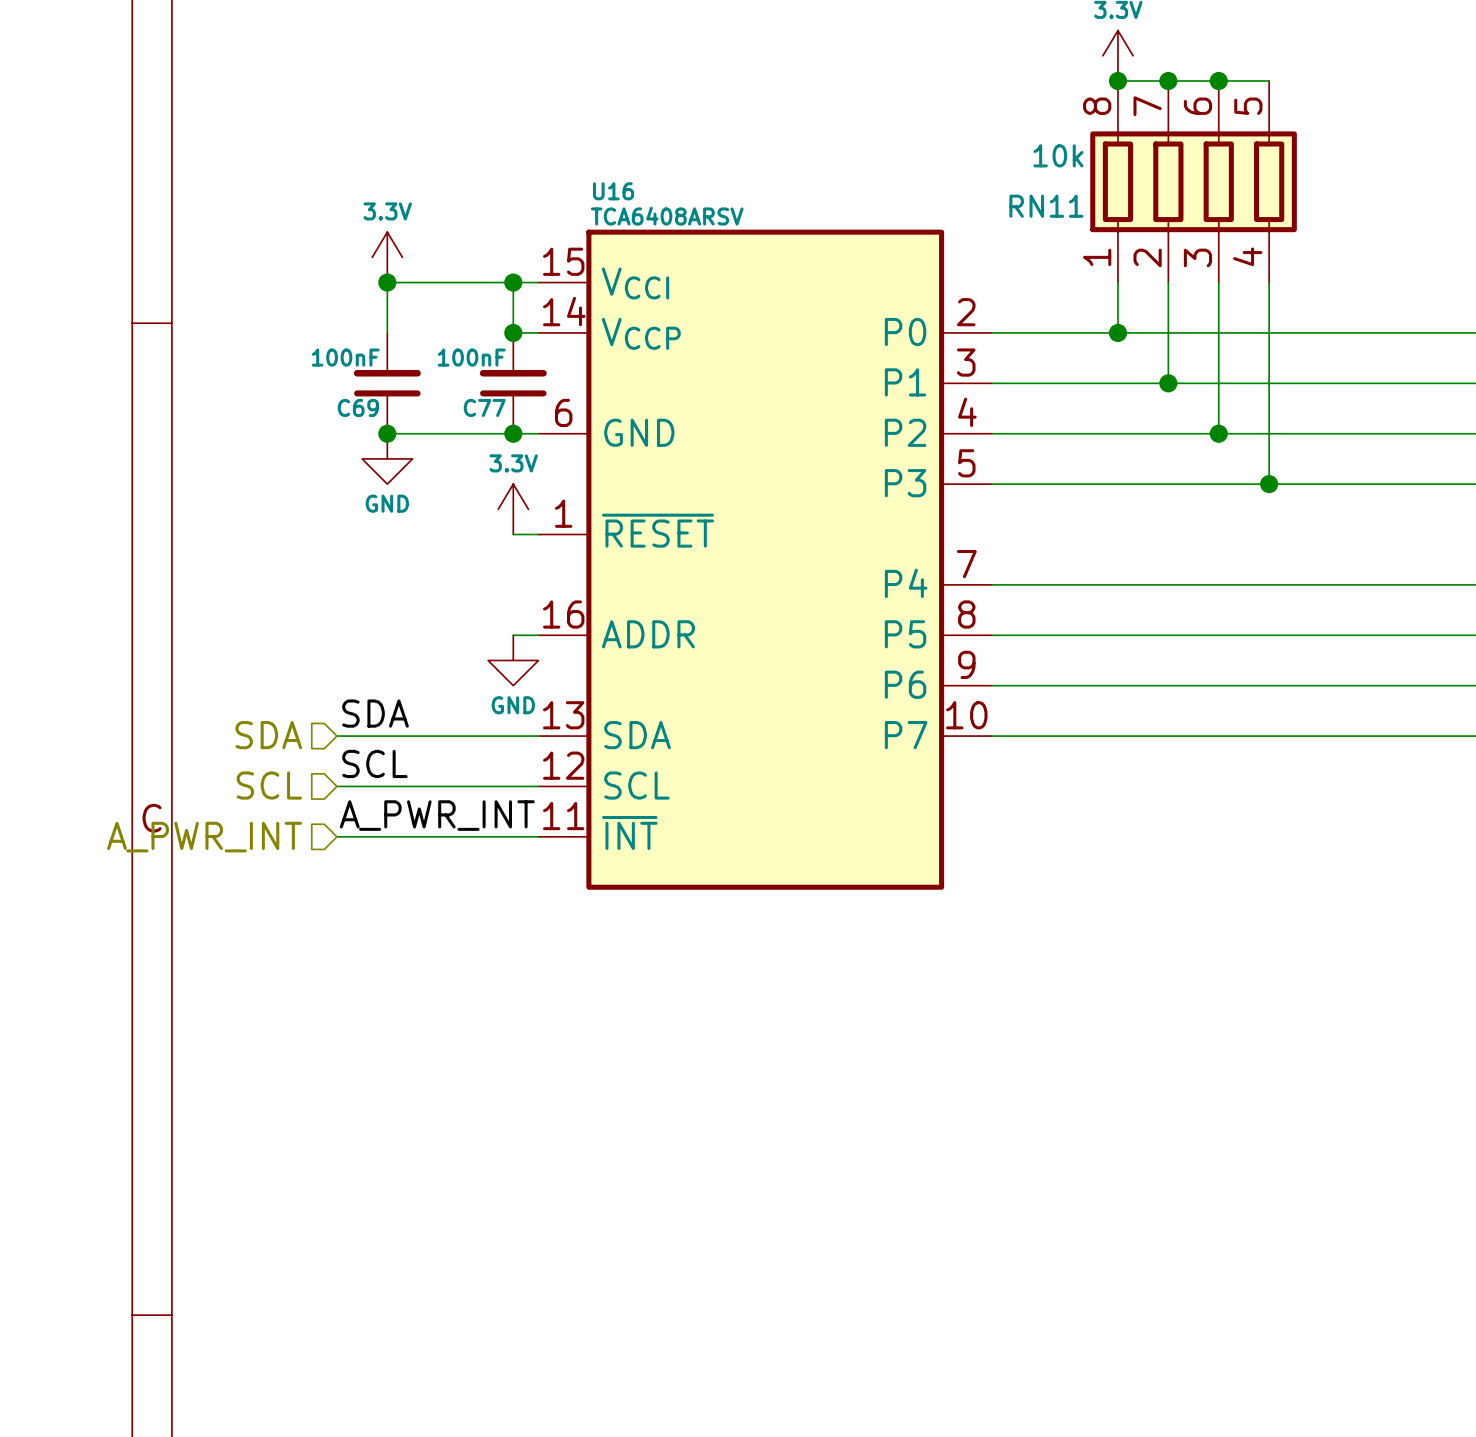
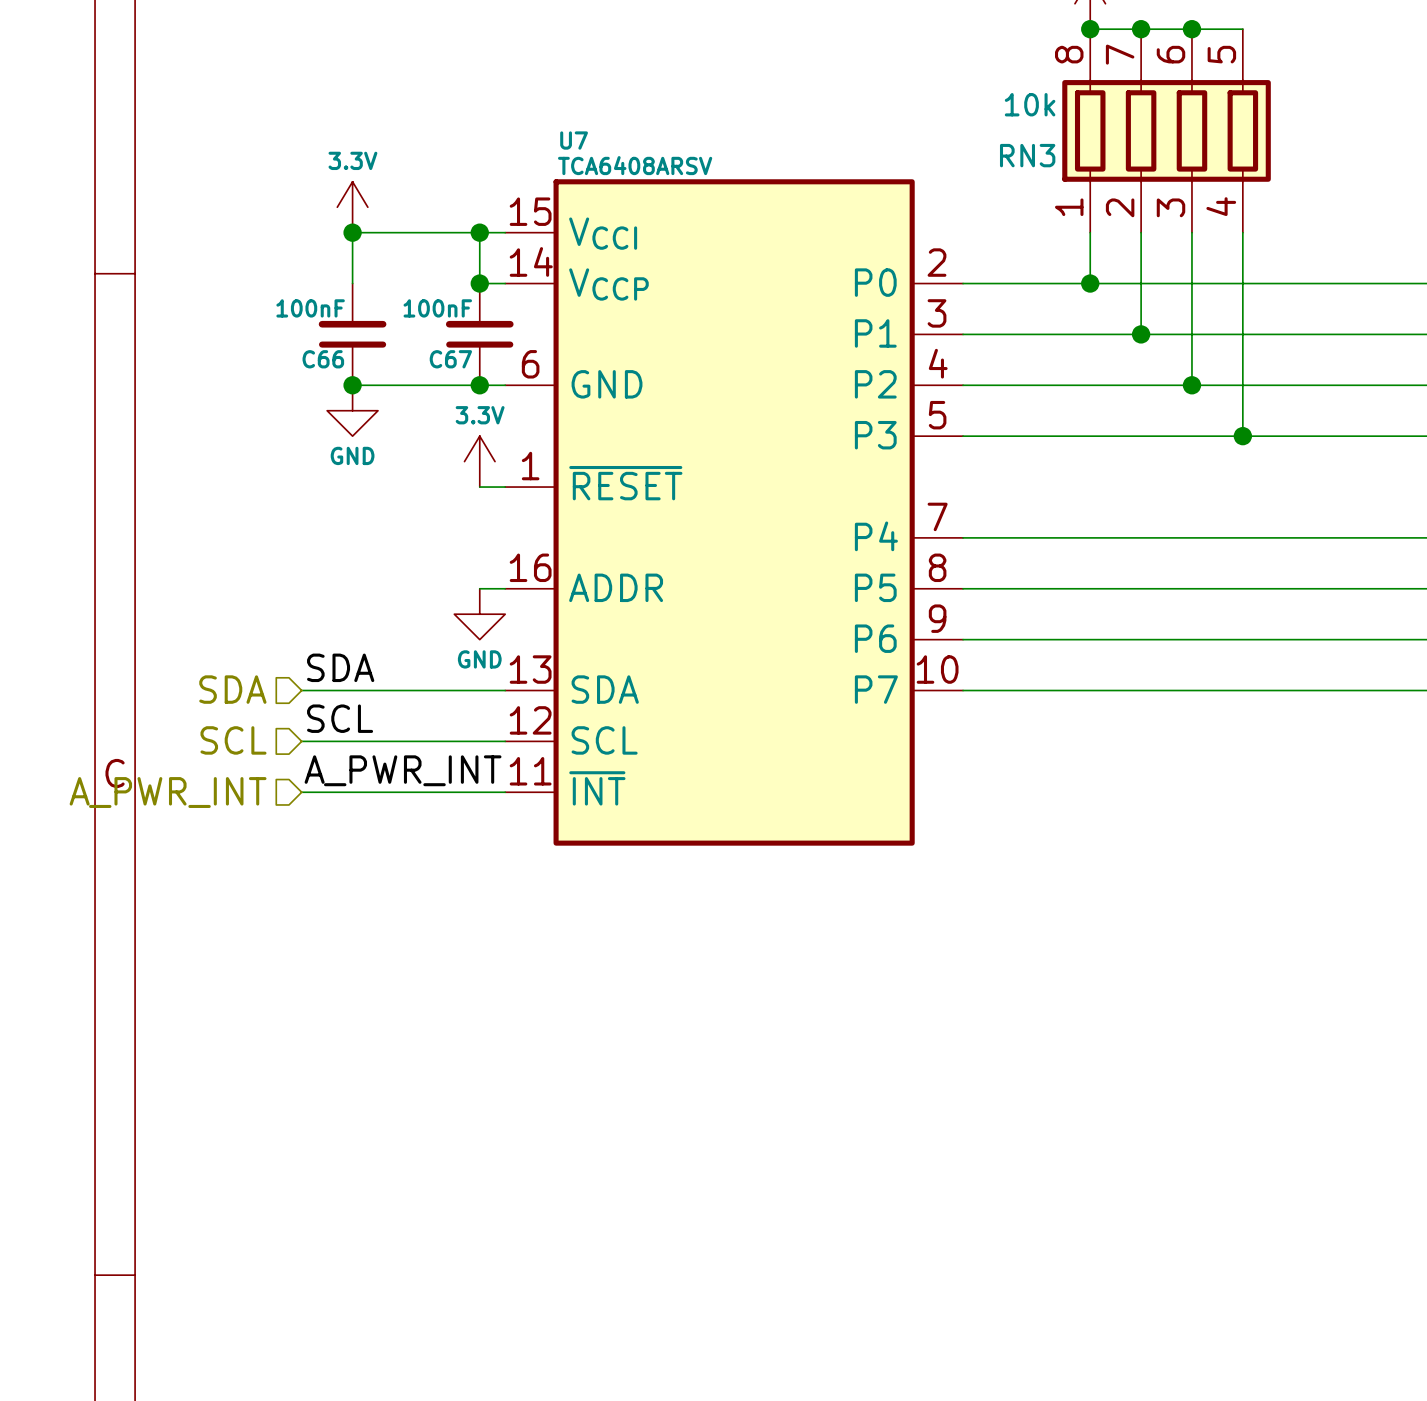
U16 name: U16 (613, 191) -> U7 (574, 140)
RN11 name: RN11 (1046, 206) -> RN3 (1027, 155)
C69 name: C69 (358, 407) -> C66 (323, 359)
C77 name: C77 (484, 407) -> C67 (450, 359)

